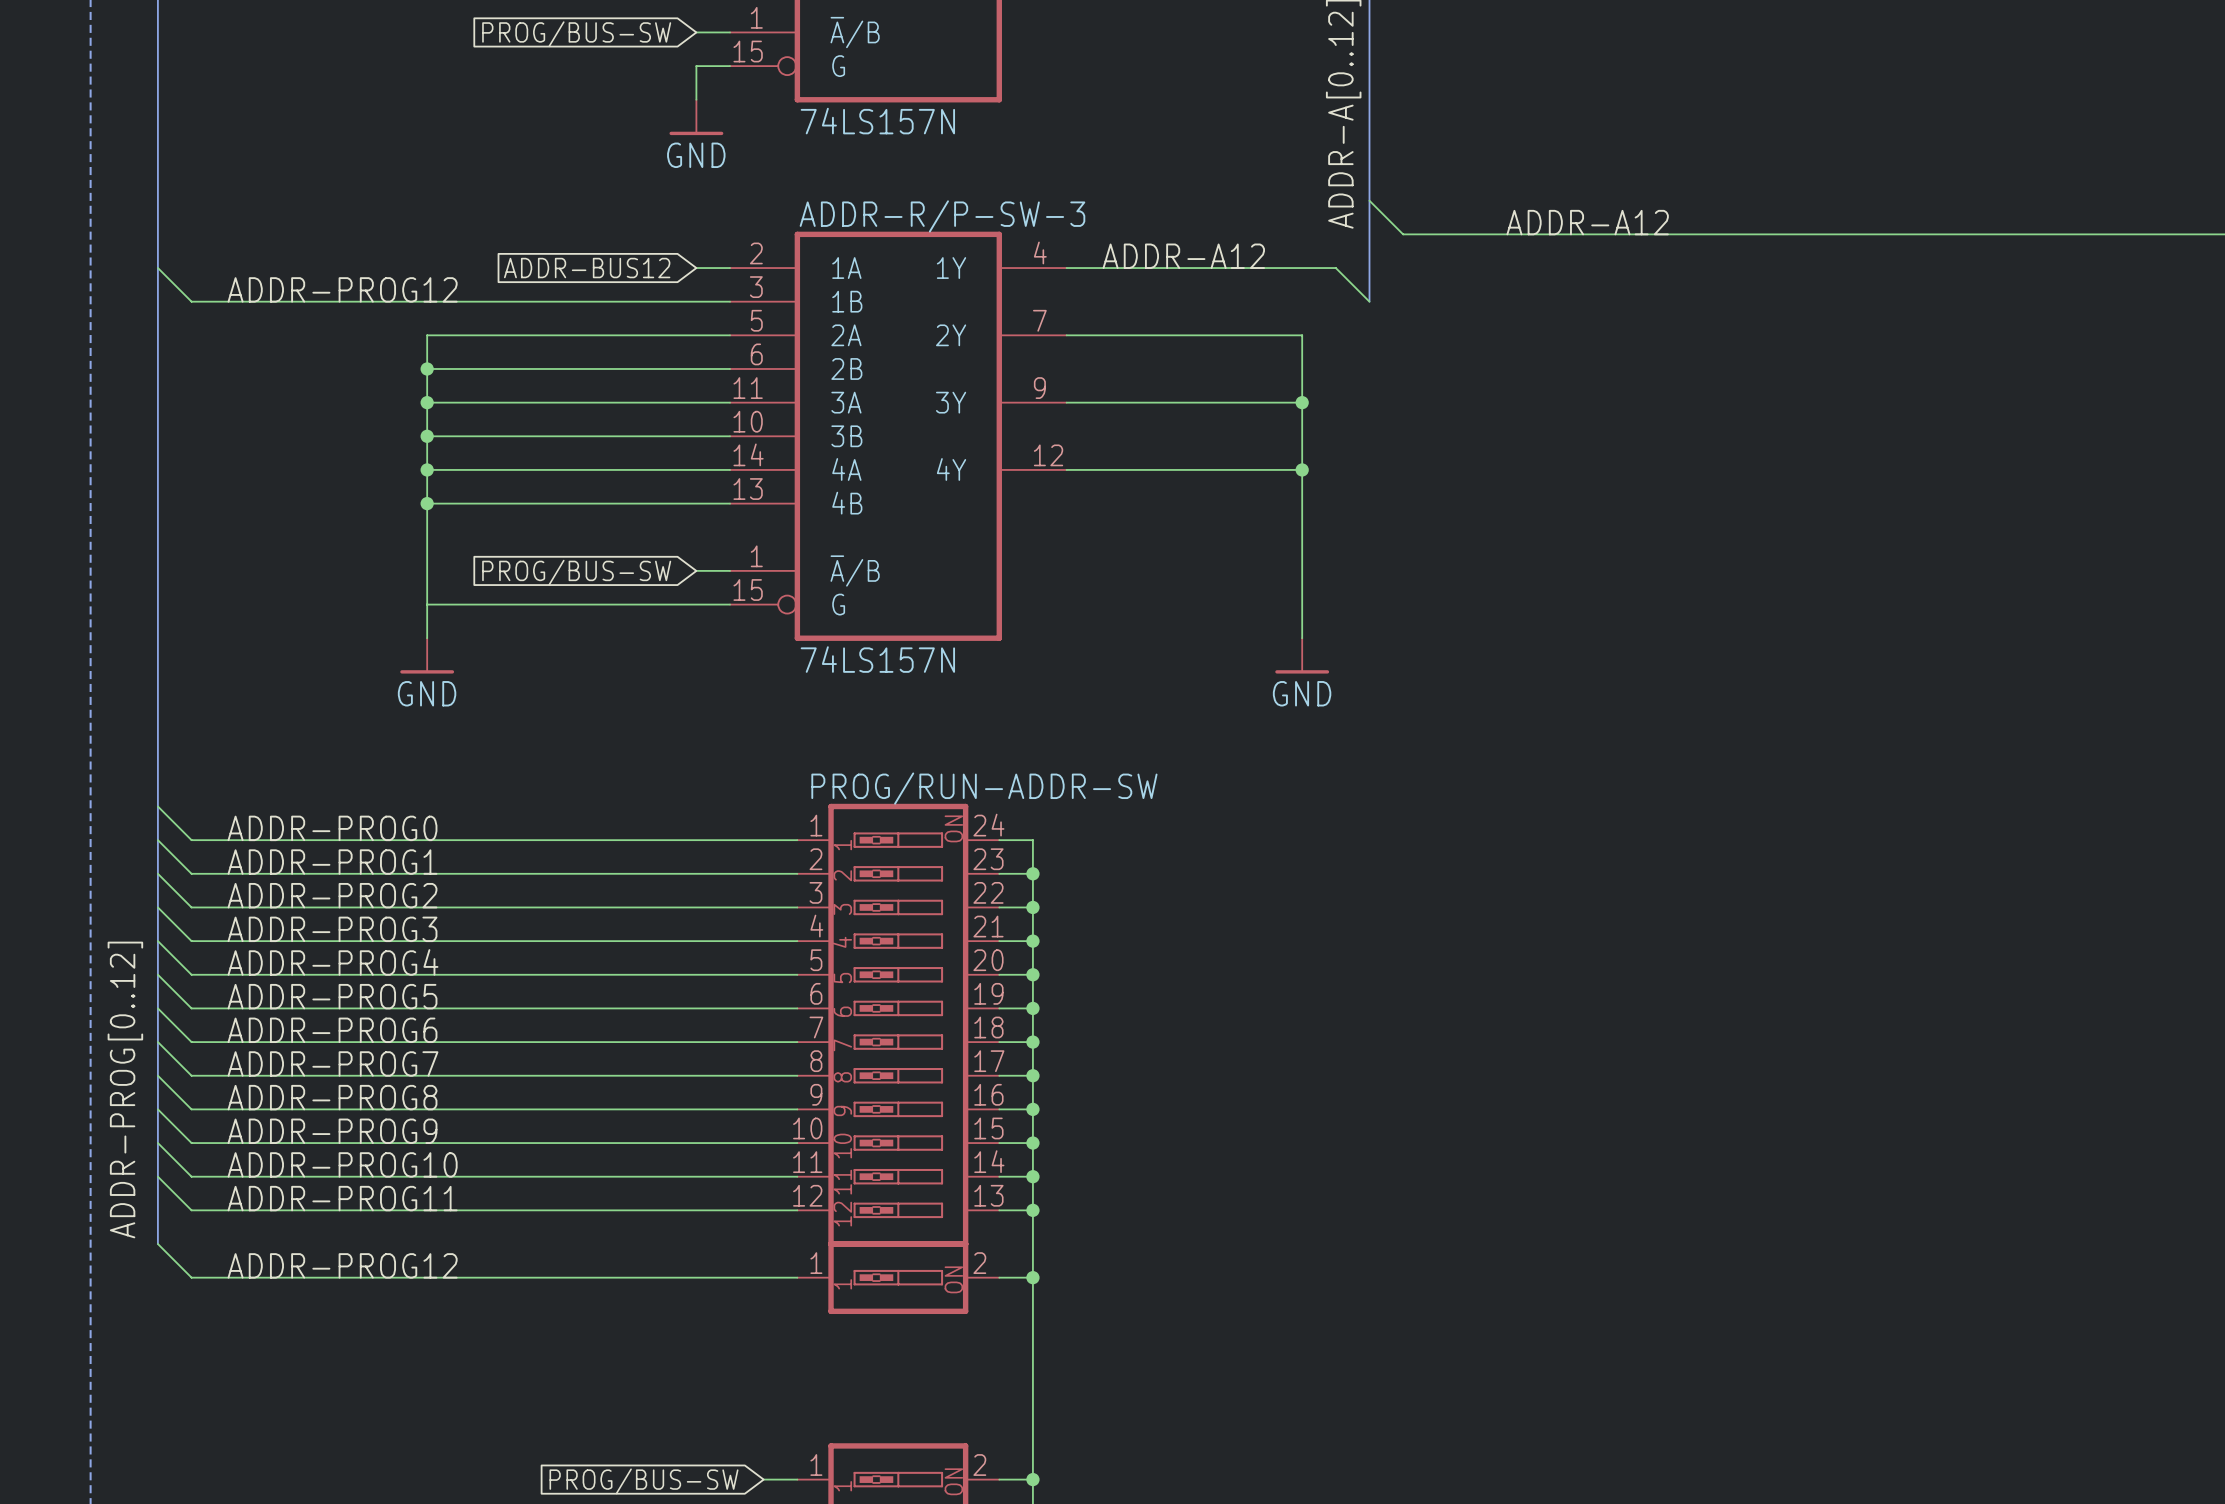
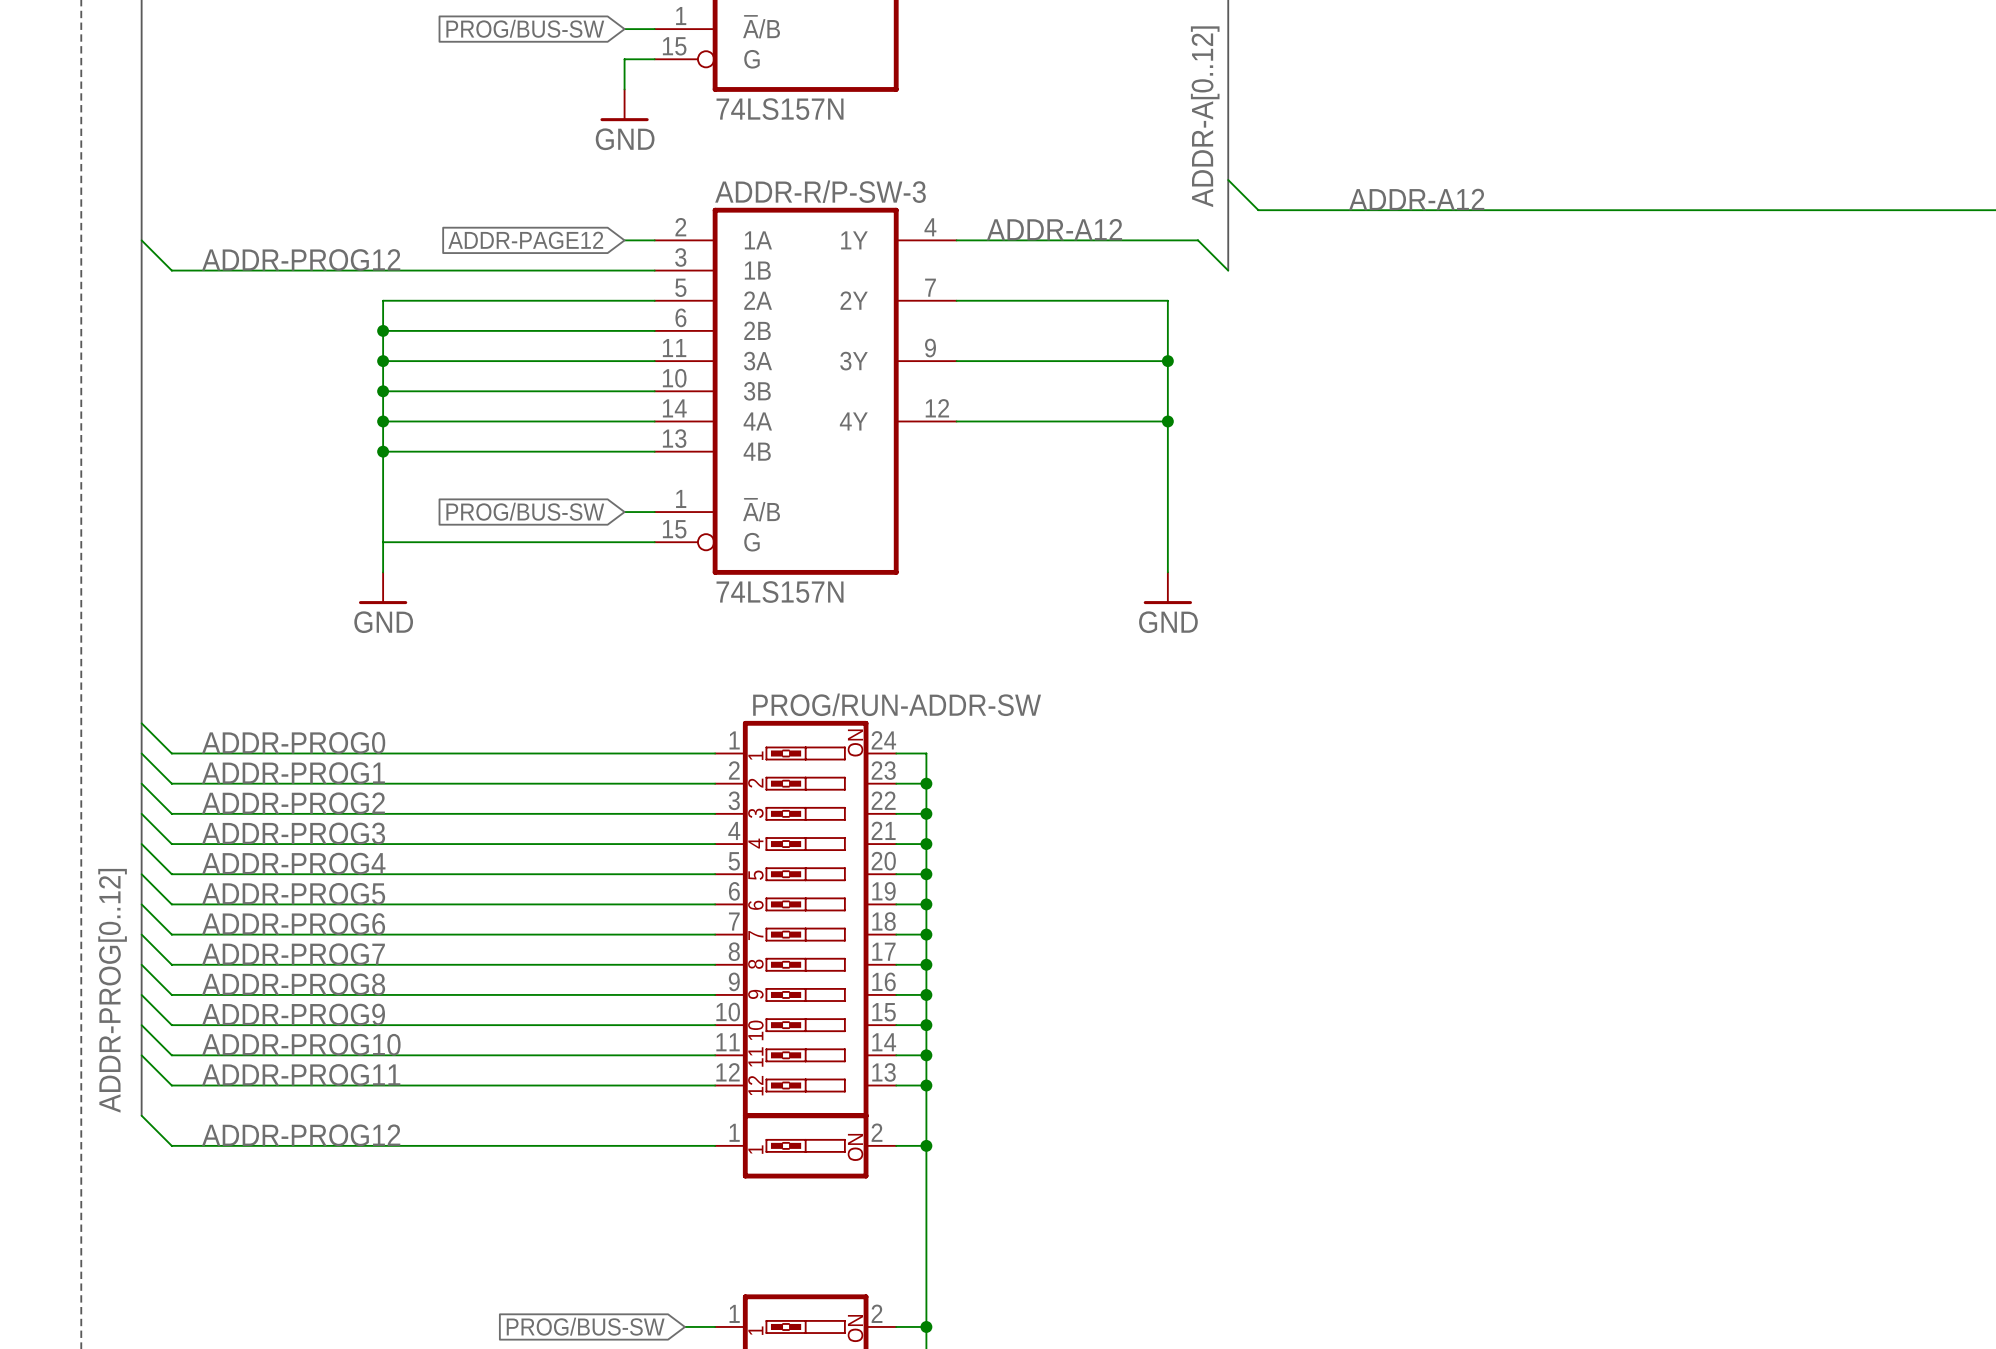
global label: ADDR-BUS12 (587, 268) -> ADDR-PAGE12 (525, 240)

